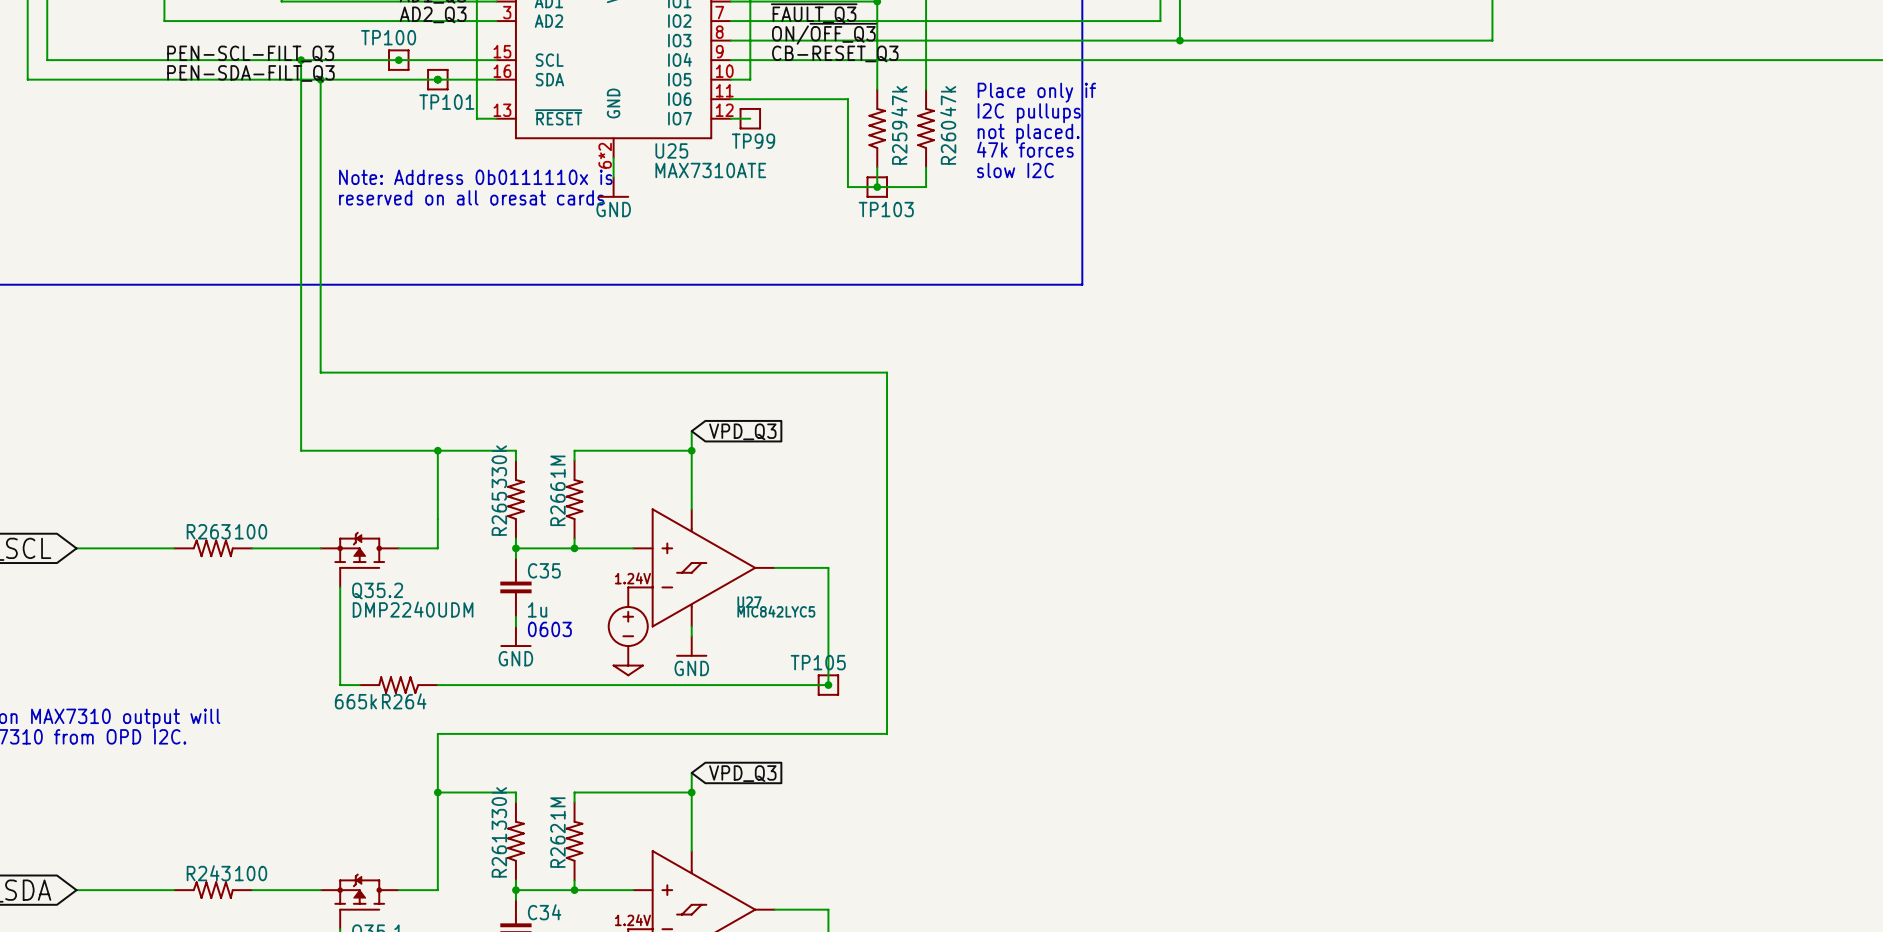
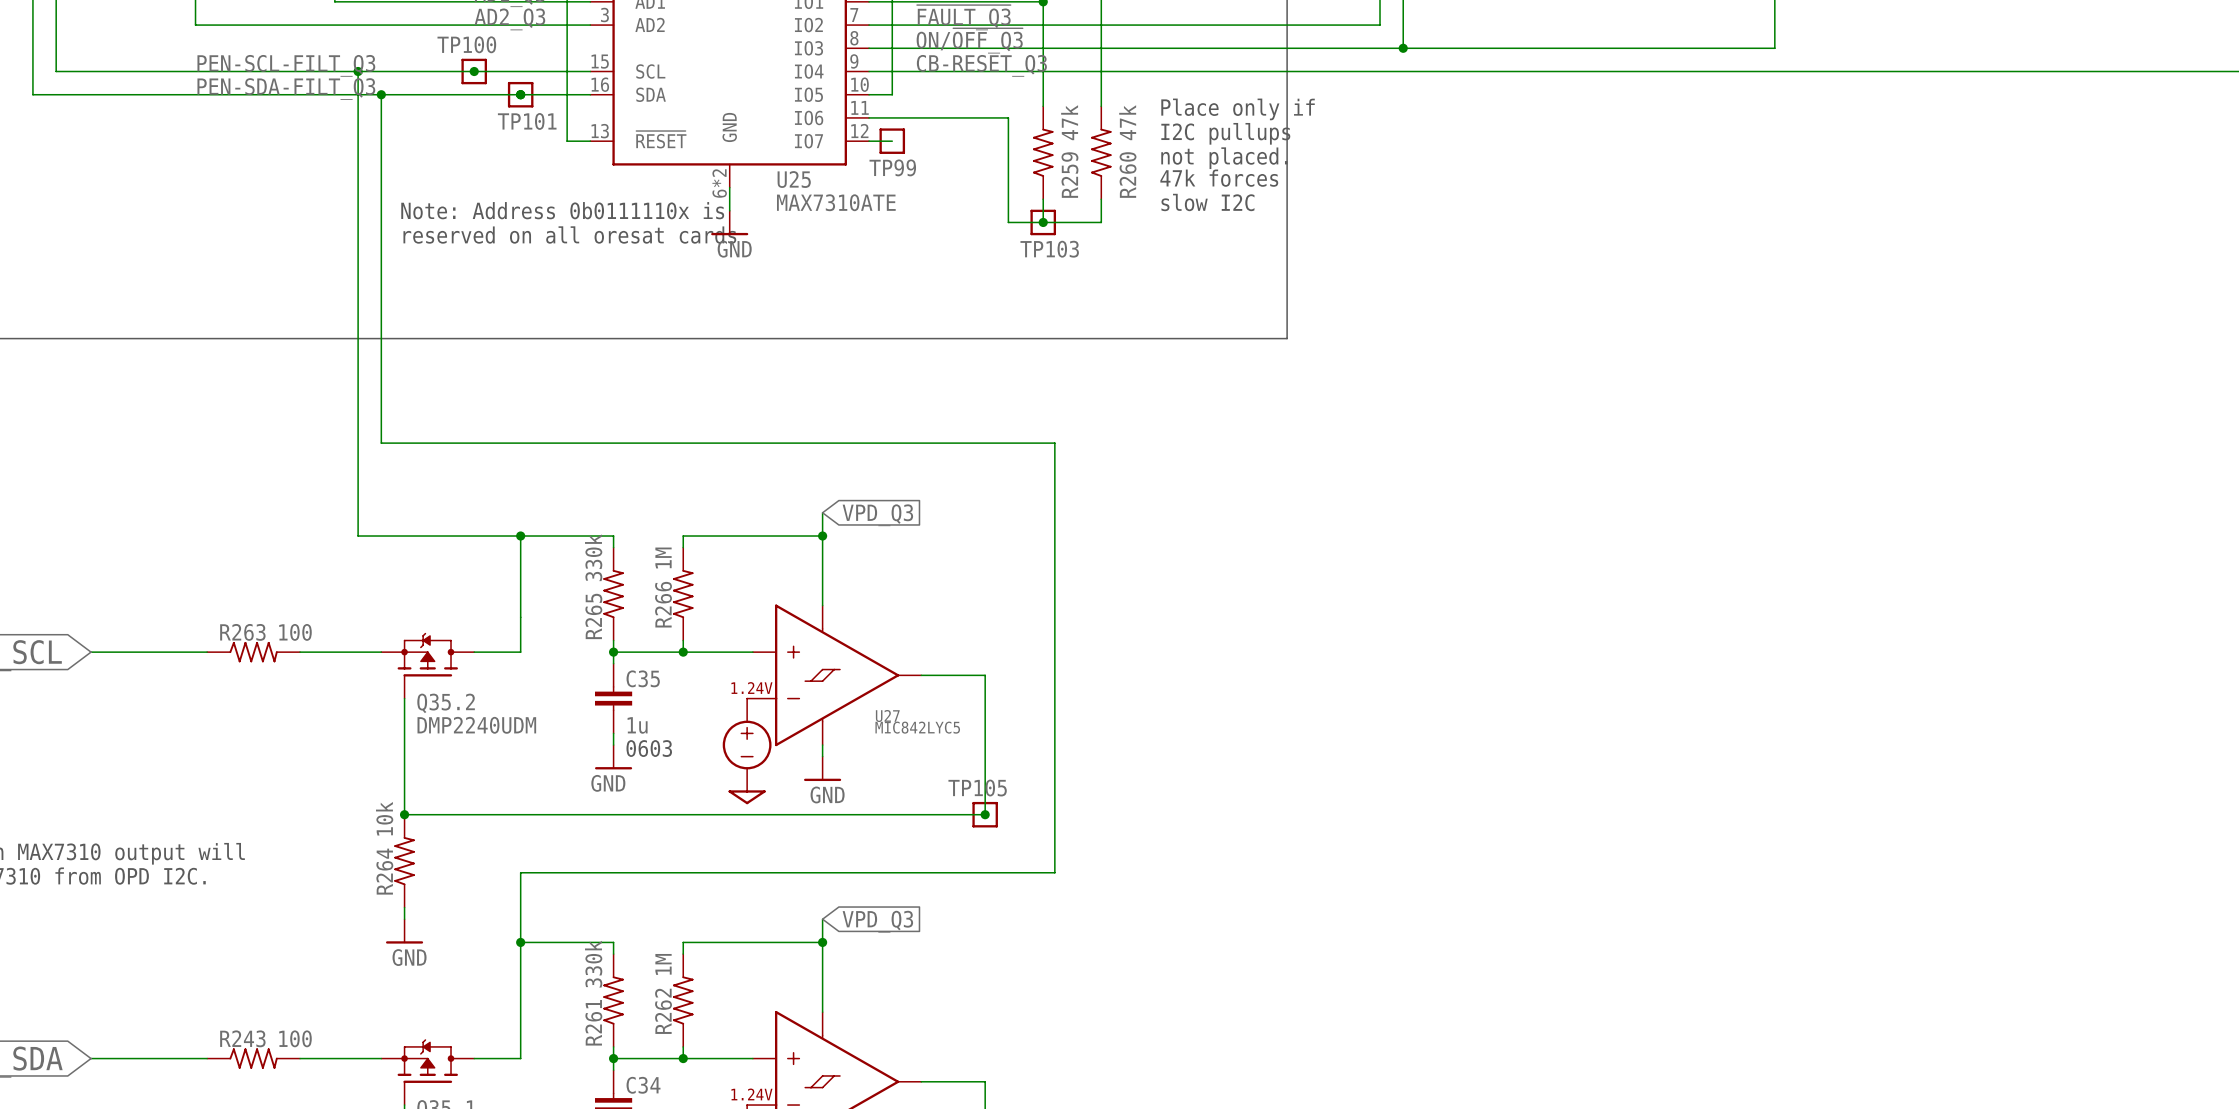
junction: none -> (404, 814)
R264 rotation: 0° (398, 685) -> 90° clockwise (404, 861)
R264 position: (398, 685) -> (404, 861)
R264 value: 665k (355, 701) -> 10k (384, 818)
wire: none -> (404, 907) (404, 919)
power symbol: none -> GND (404, 931)

